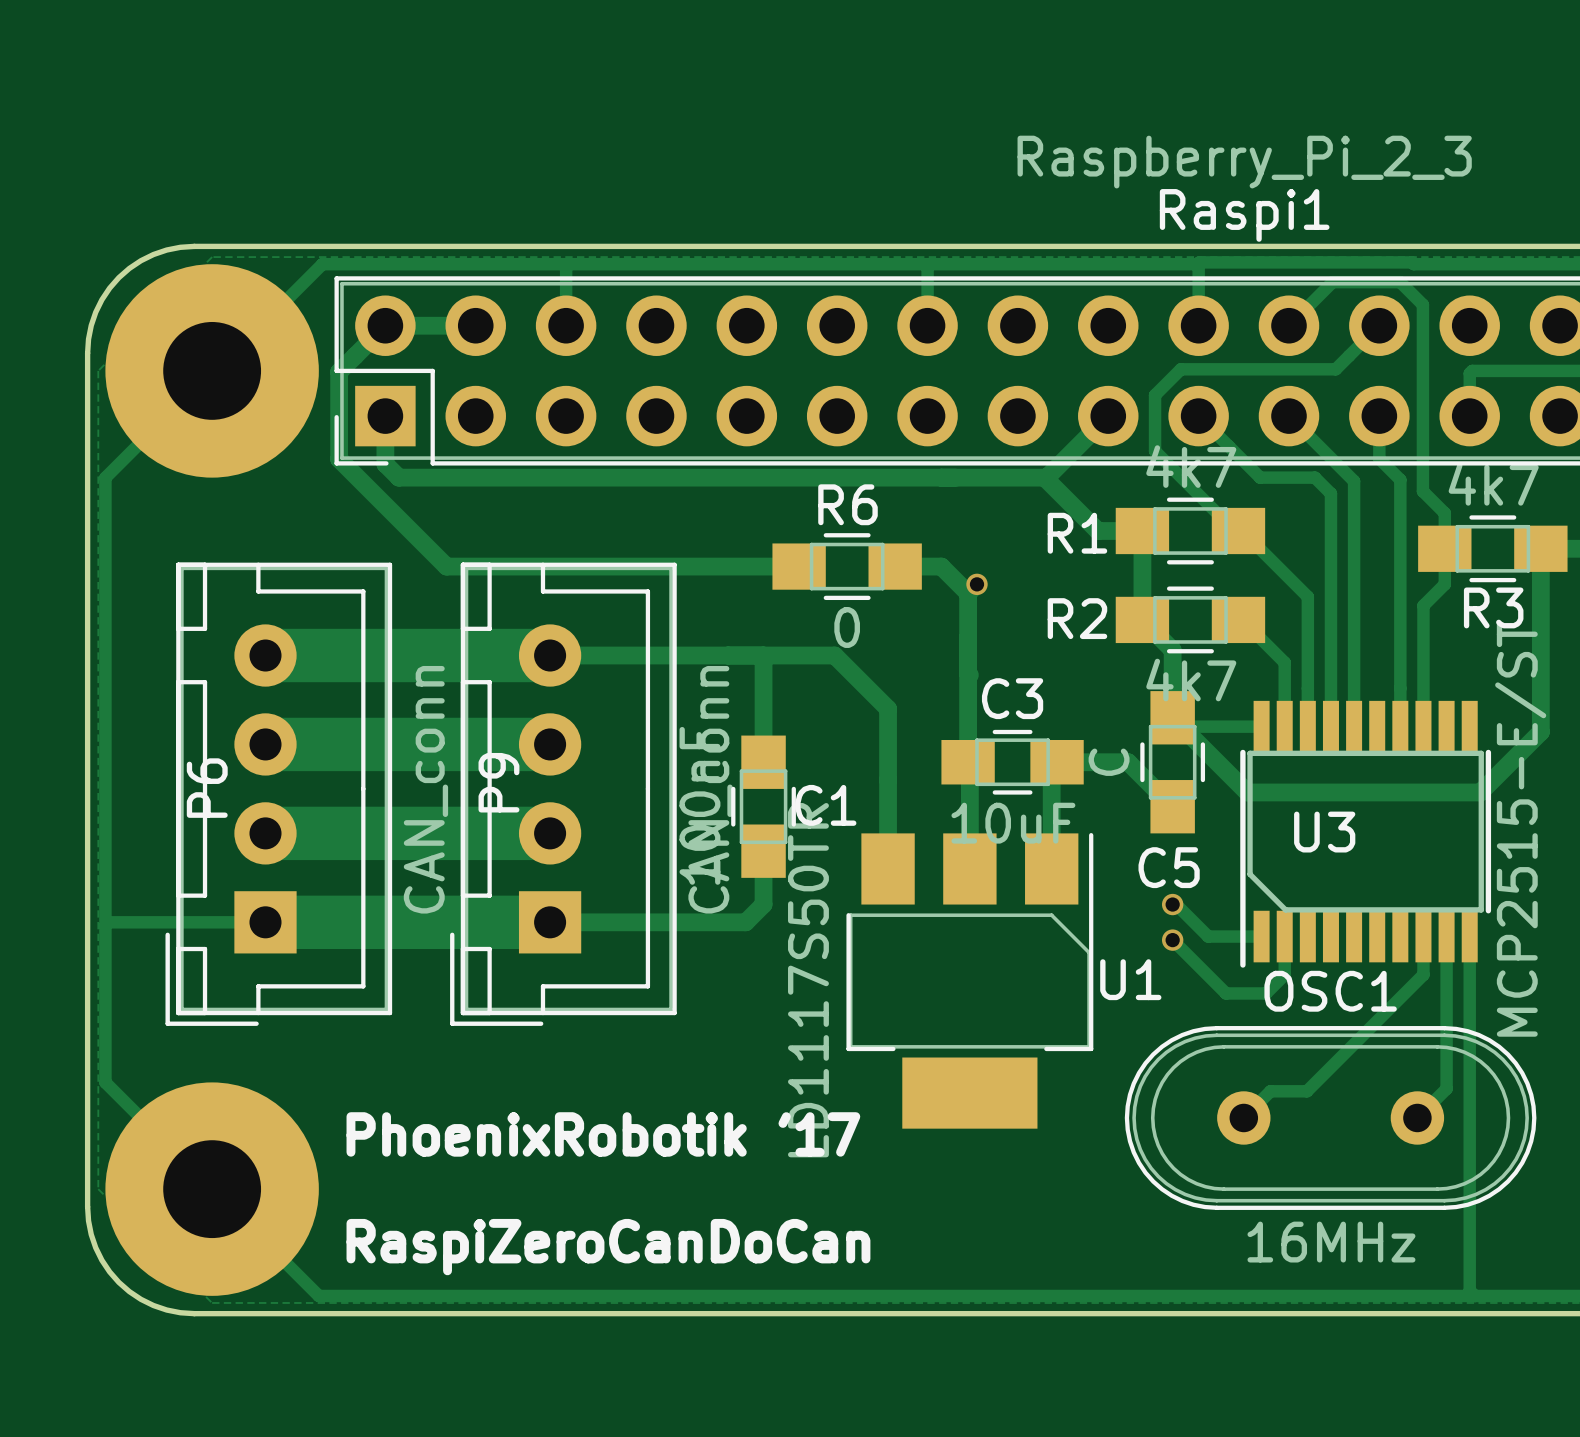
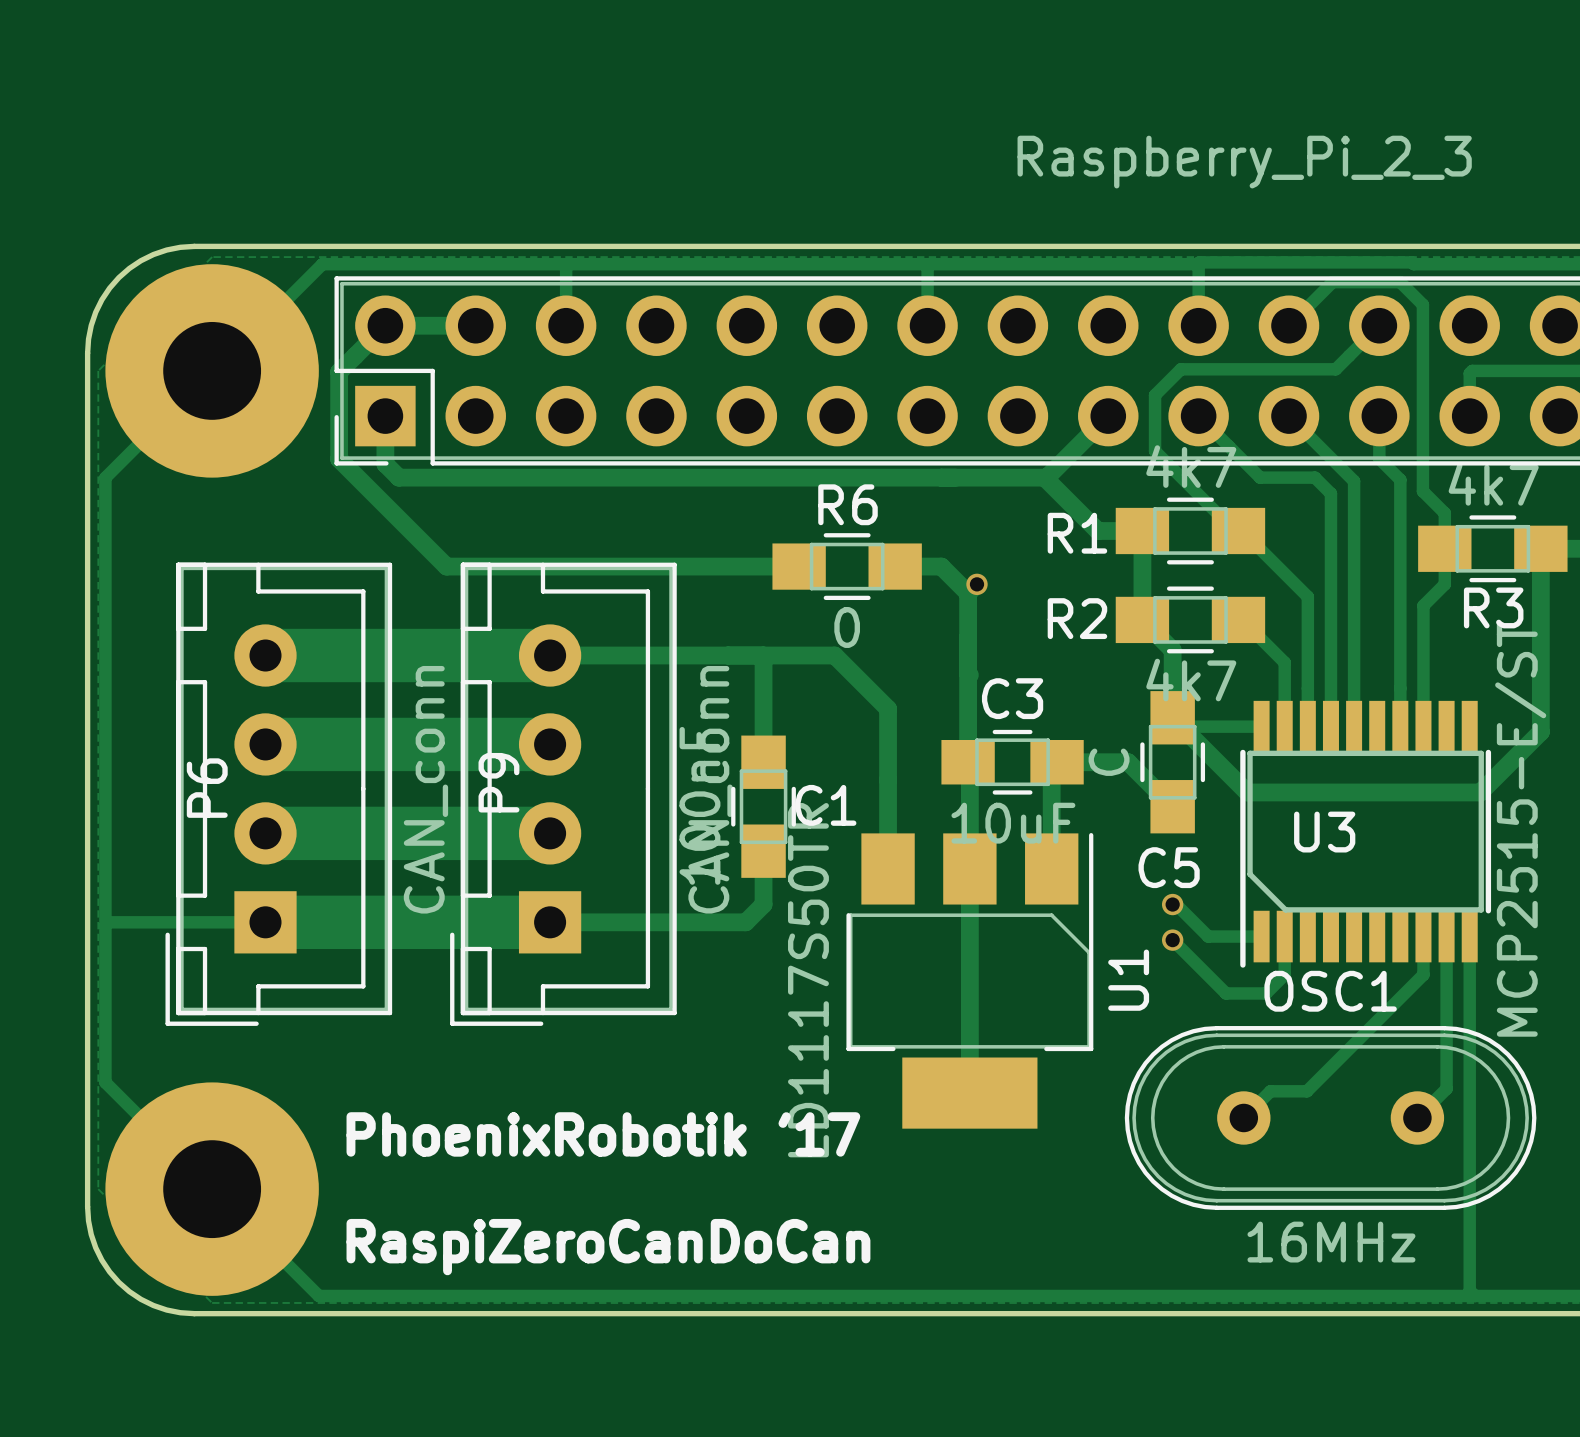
Raspi1 name: Raspi1 (1244, 215) -> none
track: none -> (969, 868) (969, 1093)
U1 name rotation: 0° (1130, 979) -> 90° counterclockwise (1128, 980)

